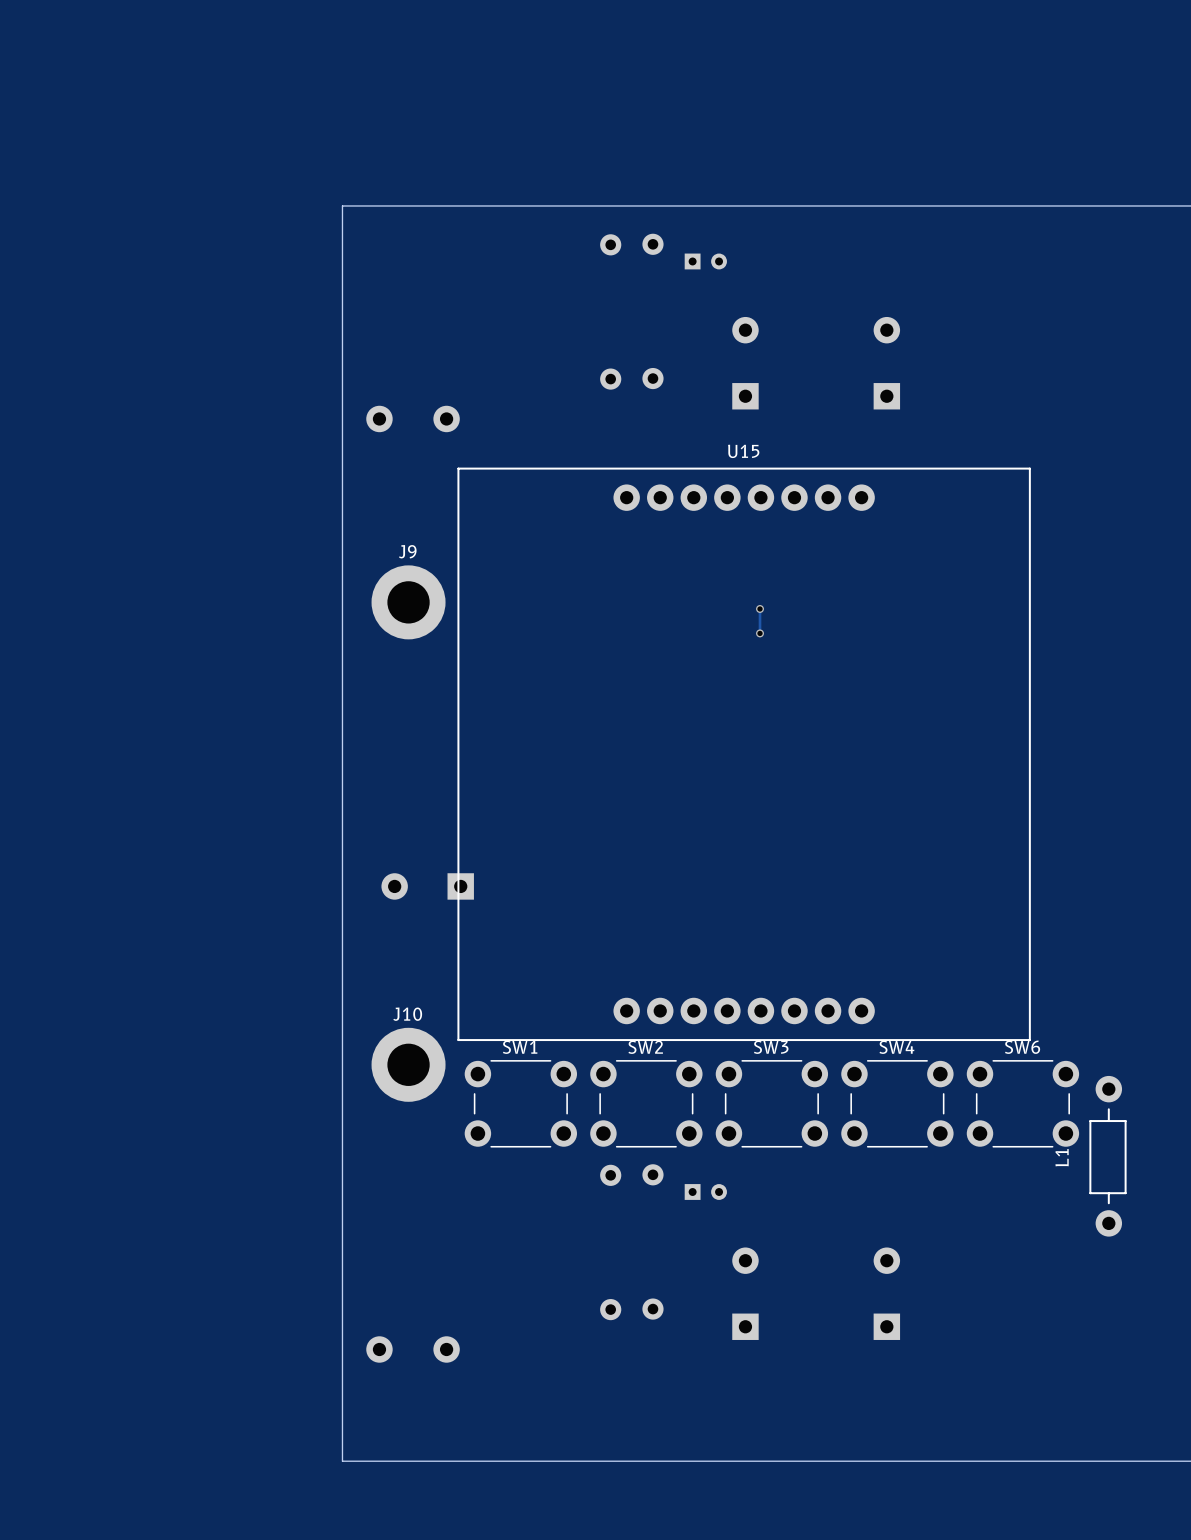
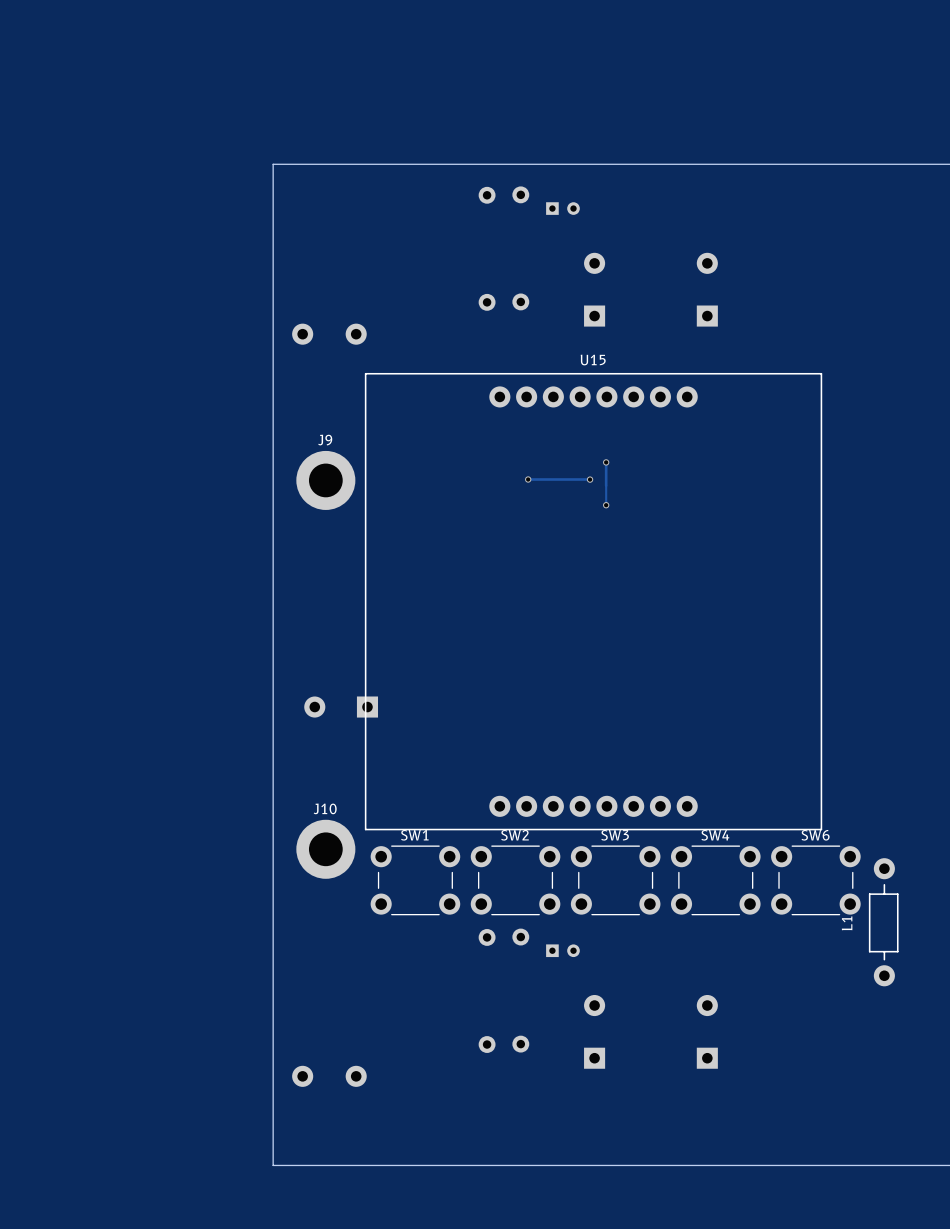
track: none -> (606, 462) (606, 485)
via: none -> (606, 462)
track: none -> (528, 479) (589, 479)
via: none -> (528, 479)
via: none -> (590, 479)
via: (760, 608) -> none

